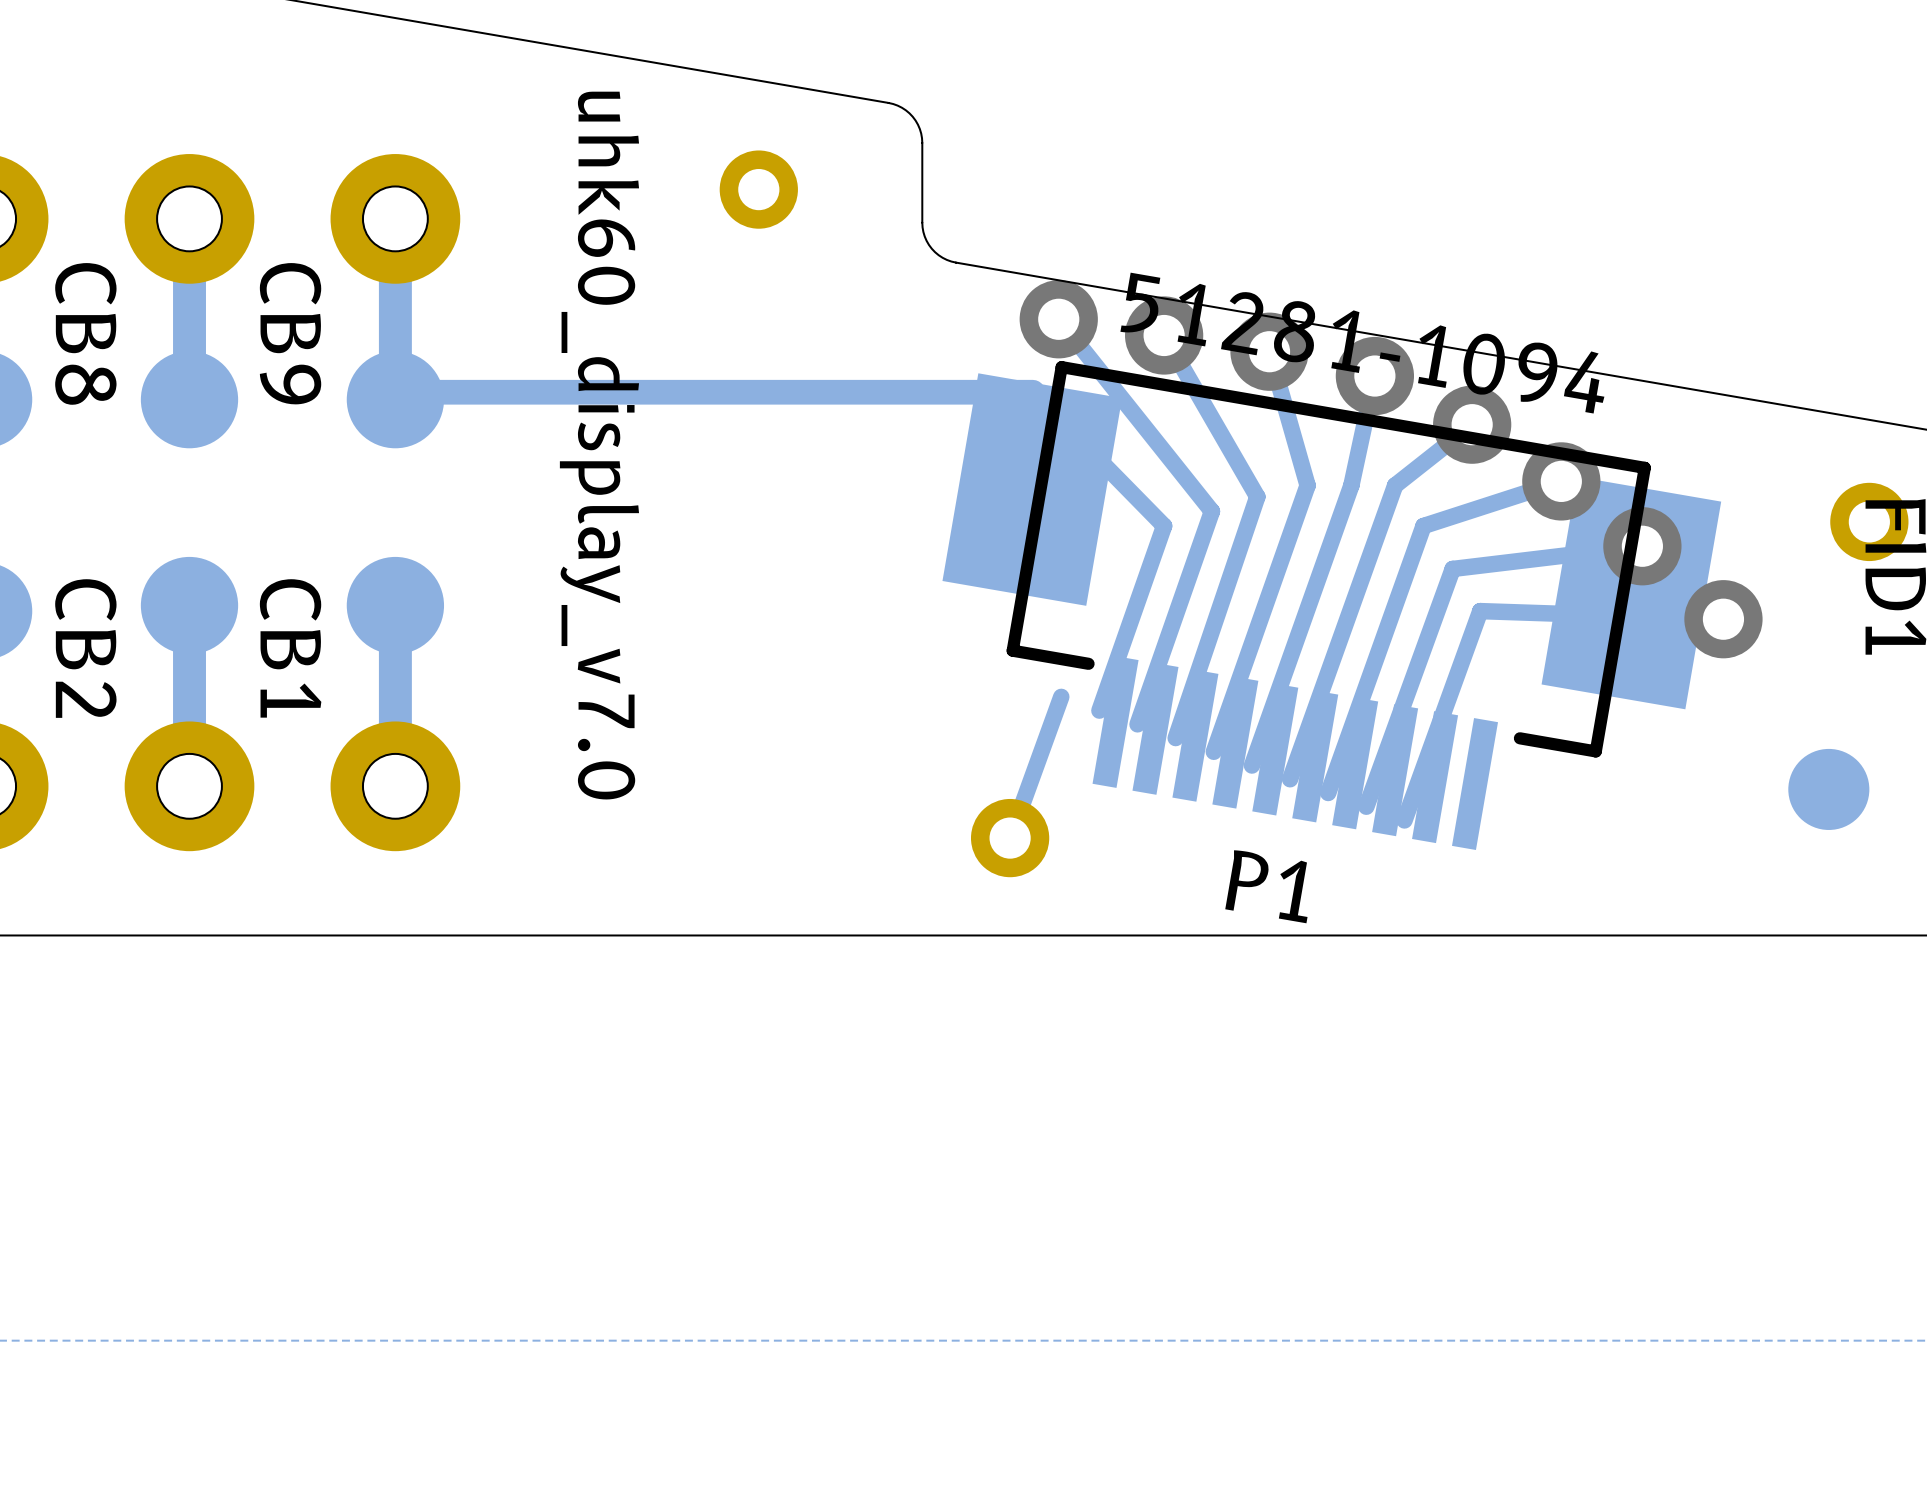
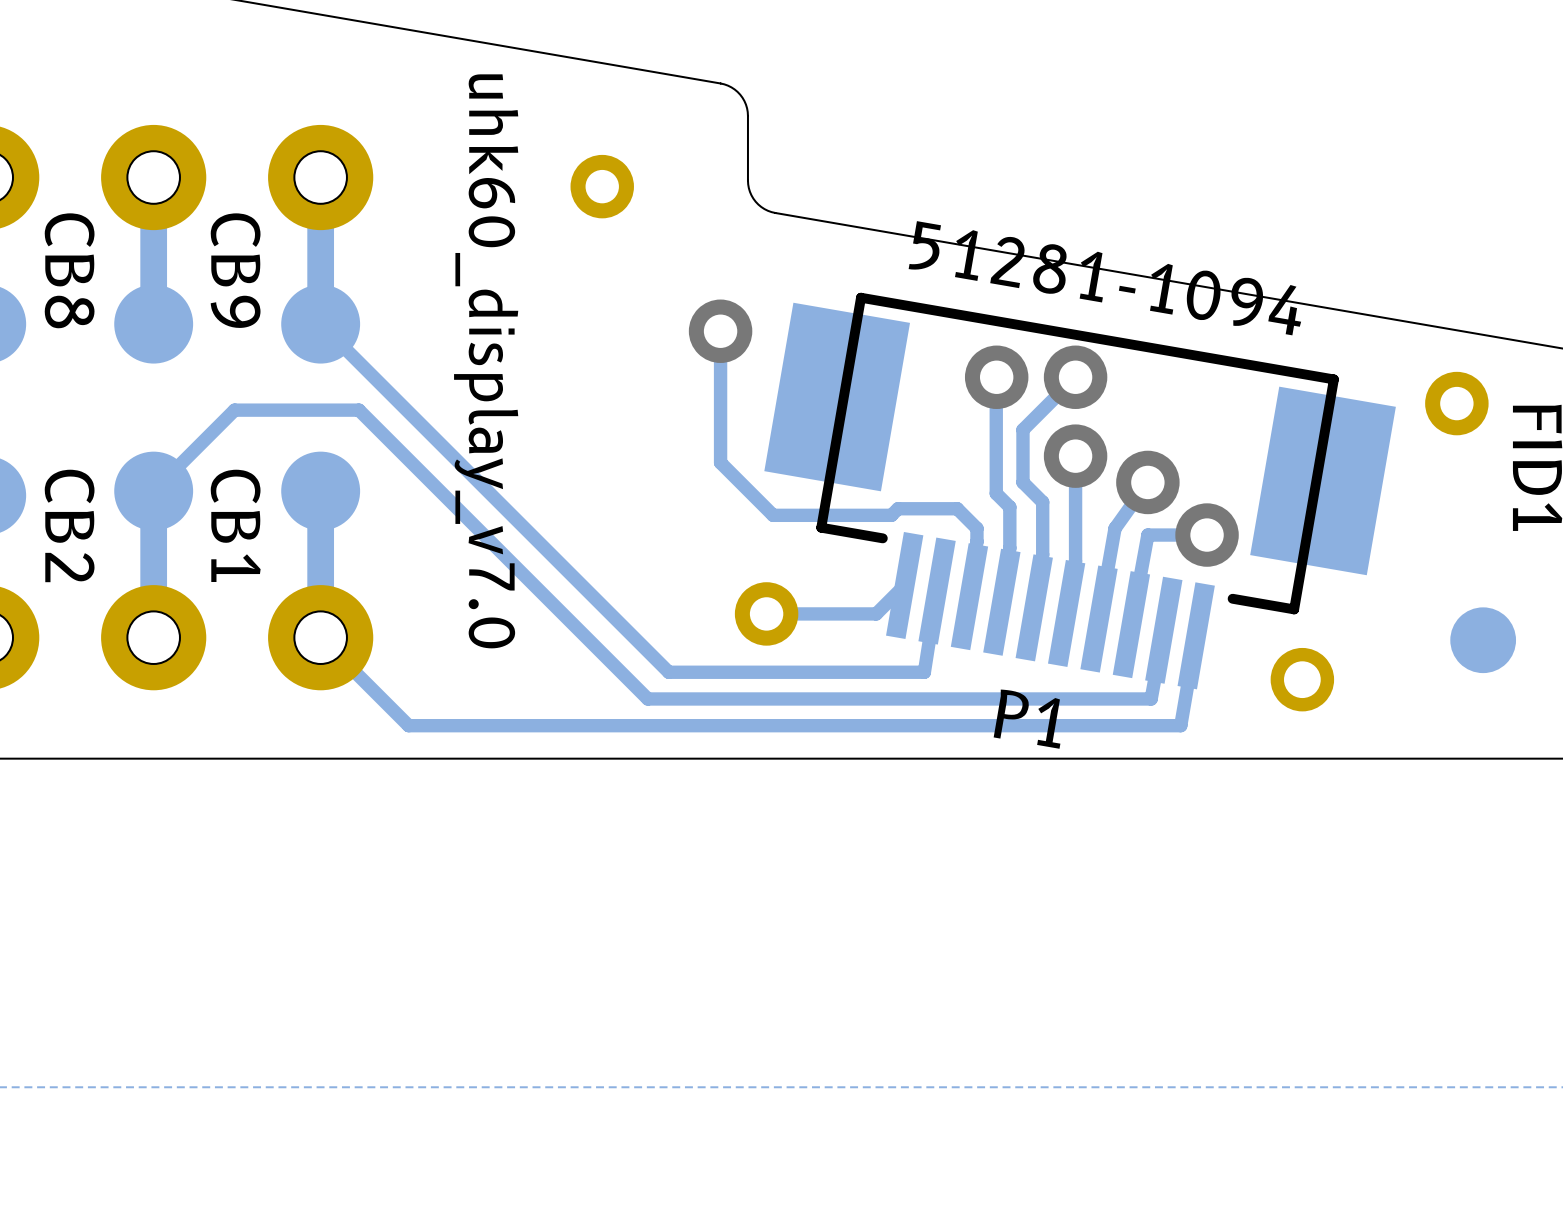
part position: (758, 189) -> (602, 186)
track: (1058, 319) (1211, 511) (1137, 724) -> none
via: (1058, 319) -> none
track: (1164, 335) (1257, 496) (1175, 738) -> none
via: (1164, 335) -> none
track: (1269, 351) (1307, 485) (1213, 751) -> none
via: (1269, 351) -> none
track: (1374, 376) (1351, 485) (1251, 765) -> none
via: (1374, 376) -> none
track: (402, 392) (1032, 392) (1164, 525) (1099, 710) -> none
track: none -> (320, 324) (668, 672) (924, 672) (937, 591)
track: none -> (720, 331) (720, 462) (773, 515) (891, 515) (898, 508) (957, 508) (976, 528) (969, 596)
via: none -> (720, 331)
track: (1472, 424) (1395, 485) (1290, 779) -> none
via: (1472, 424) -> none
track: none -> (996, 377) (996, 493) (1009, 507) (1009, 548) (1001, 602)
via: none -> (996, 377)
track: none -> (1075, 377) (1022, 429) (1022, 482) (1042, 502) (1042, 554) (1034, 607)
via: none -> (1075, 377)
track: (1561, 481) (1423, 525) (1328, 792) -> none
via: (1561, 481) -> none
part position: (1869, 521) -> (1456, 403)
track: (1642, 546) (1452, 568) (1366, 806) -> none
via: (1642, 546) -> none
track: none -> (1075, 456) (1075, 561) (1066, 613)
via: none -> (1075, 456)
track: none -> (1147, 482) (1115, 528) (1099, 619)
via: none -> (1147, 482)
track: none -> (153, 491) (234, 410) (359, 410) (647, 698) (1151, 698) (1163, 630)
track: (1723, 619) (1480, 611) (1404, 820) -> none
via: (1723, 619) -> none
track: none -> (1207, 535) (1147, 535) (1131, 624)
via: none -> (1207, 535)
track: (1061, 696) (1010, 838) -> none
track: none -> (904, 585) (876, 613) (766, 613)
track: none -> (1196, 635) (1180, 725) (408, 725) (320, 637)
part position: (1010, 838) -> (766, 613)
part: none -> (1302, 679)

